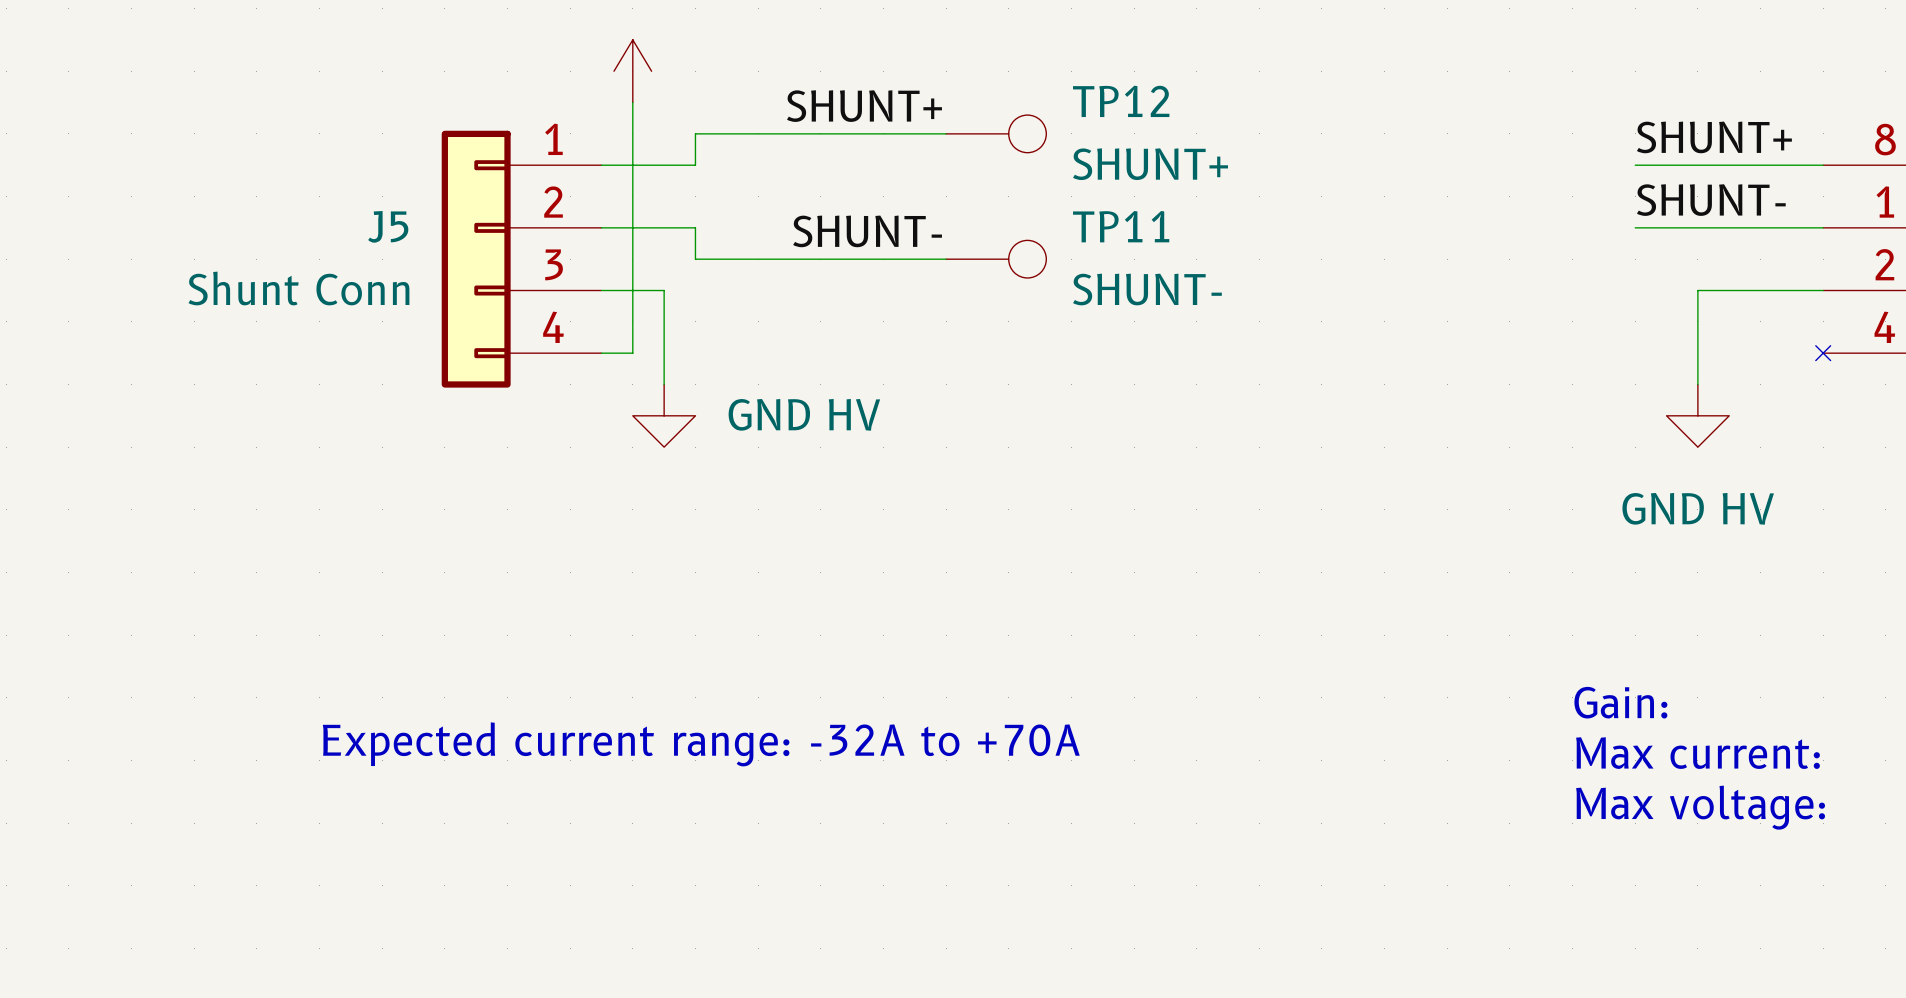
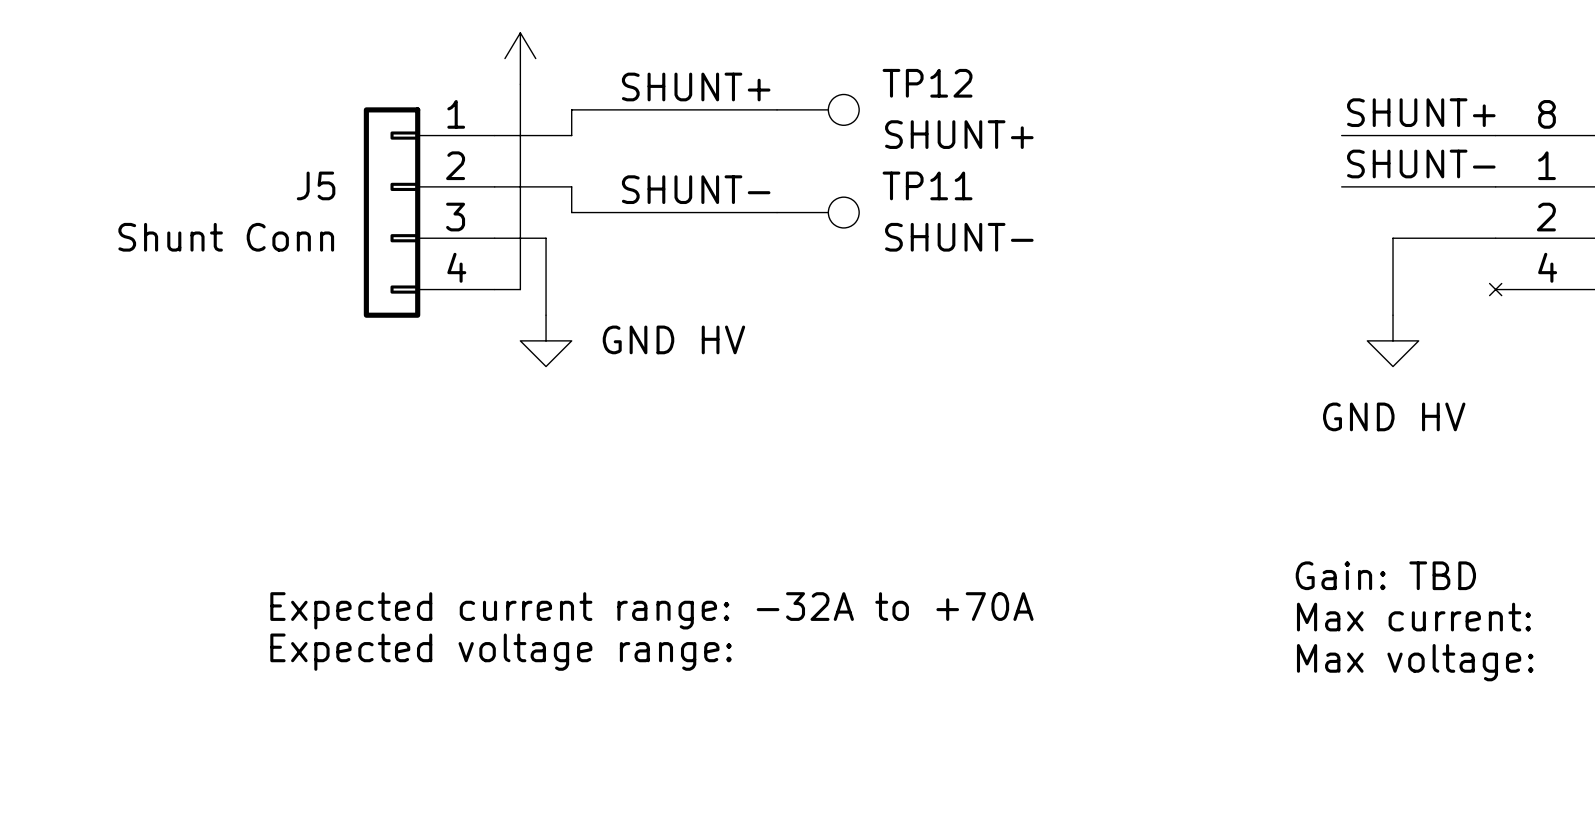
text: Gain: (1620, 702) -> Gain: TBD (1385, 575)
text: none -> Expected voltage range: (501, 652)

